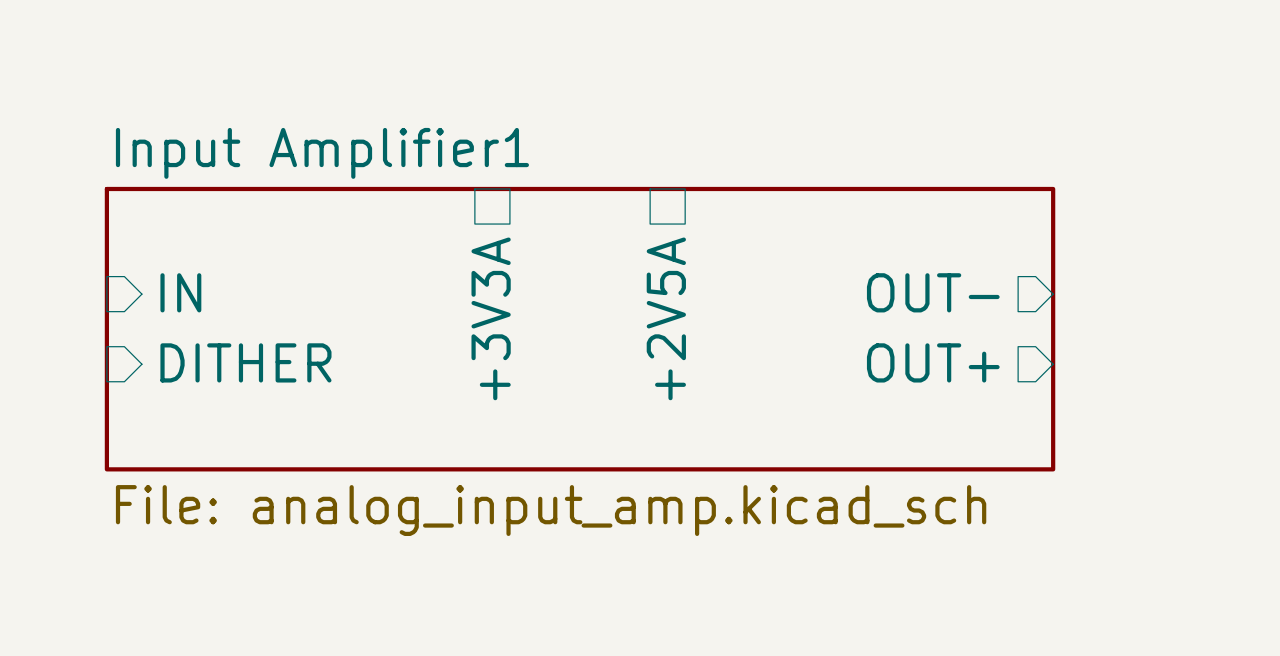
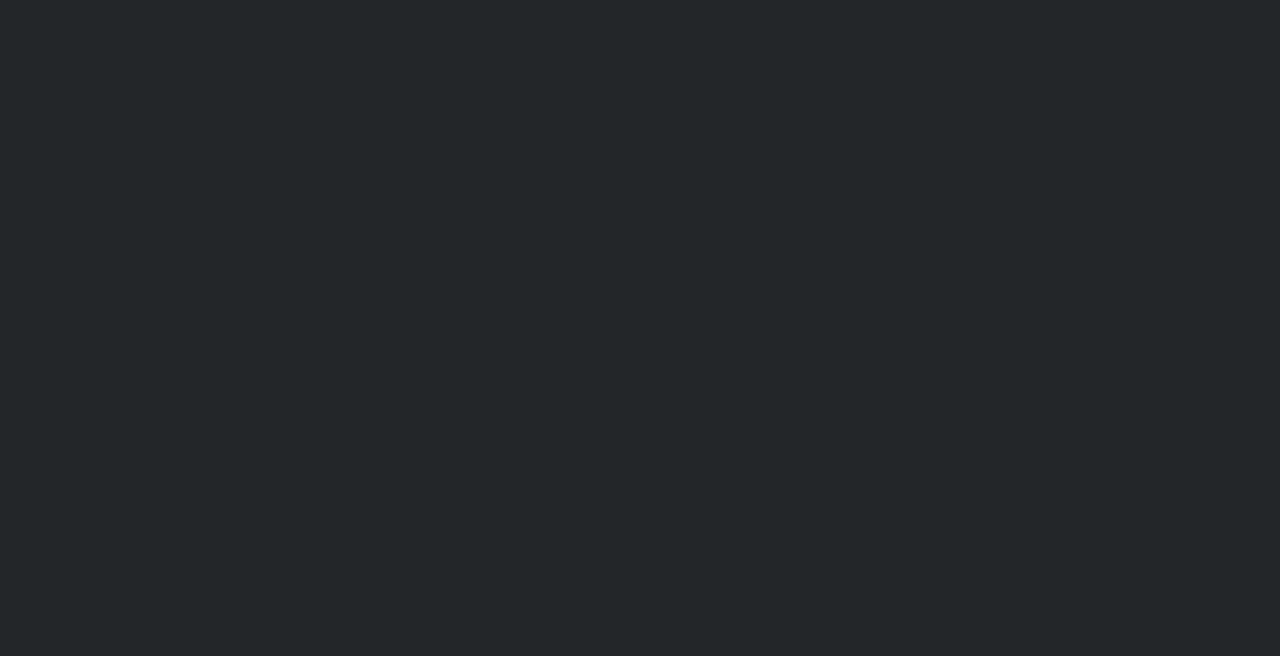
sheet pin: IN (180, 292) -> none
sheet pin: OUT- (933, 292) -> none
sheet pin: +3V3A (491, 318) -> none
sheet pin: +2V5A (666, 318) -> none
sheet Input Amplifier1: File: analog_input_amp.kicad_sch (580, 329) -> none
sheet pin: DITHER (245, 362) -> none
sheet pin: OUT+ (933, 362) -> none

